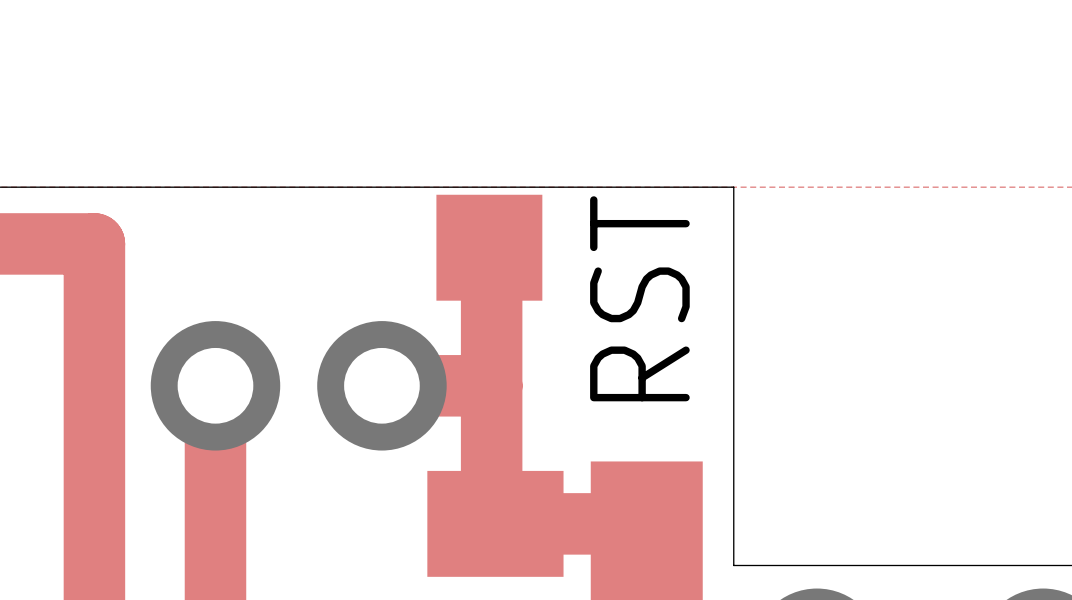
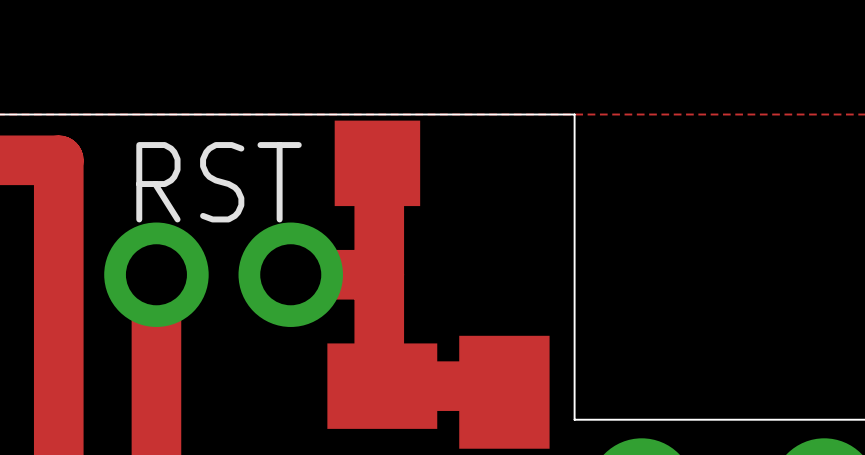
RST name rotation: 0° (639, 298) -> 90° clockwise (219, 182)
RST name position: RST (639, 298) -> RST (219, 182)

